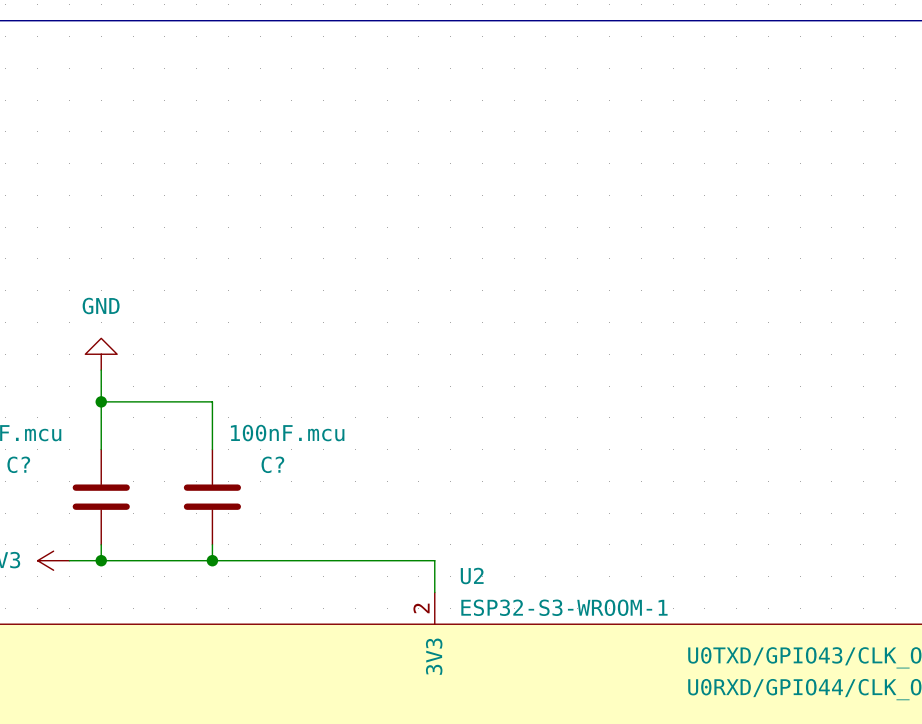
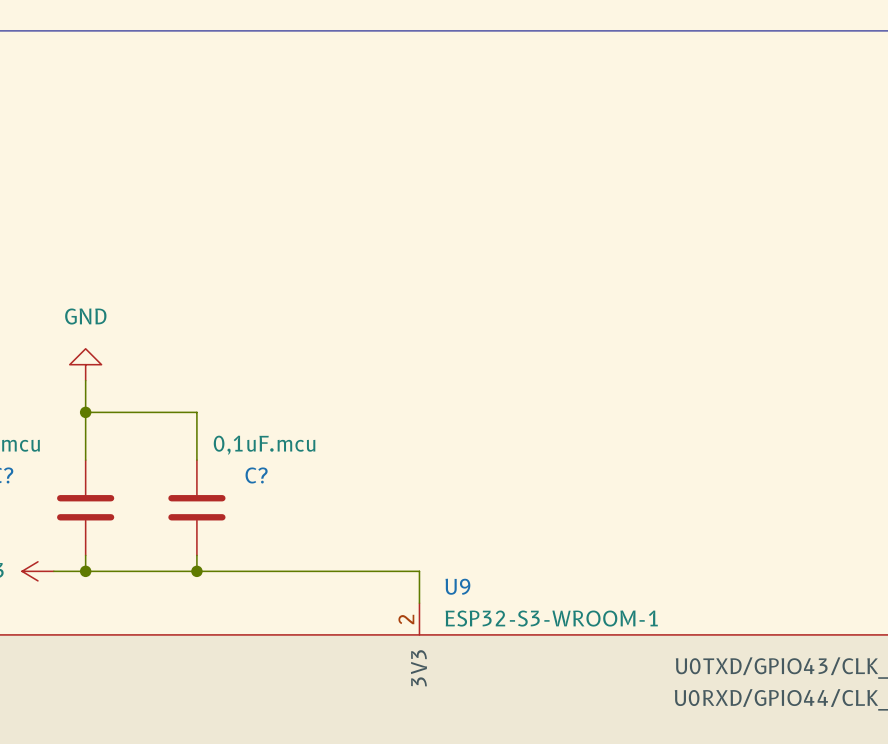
C? value: 100nF.mcu (287, 433) -> 0,1uF.mcu (264, 445)
U2 name: U2 (472, 576) -> U9 (457, 586)

